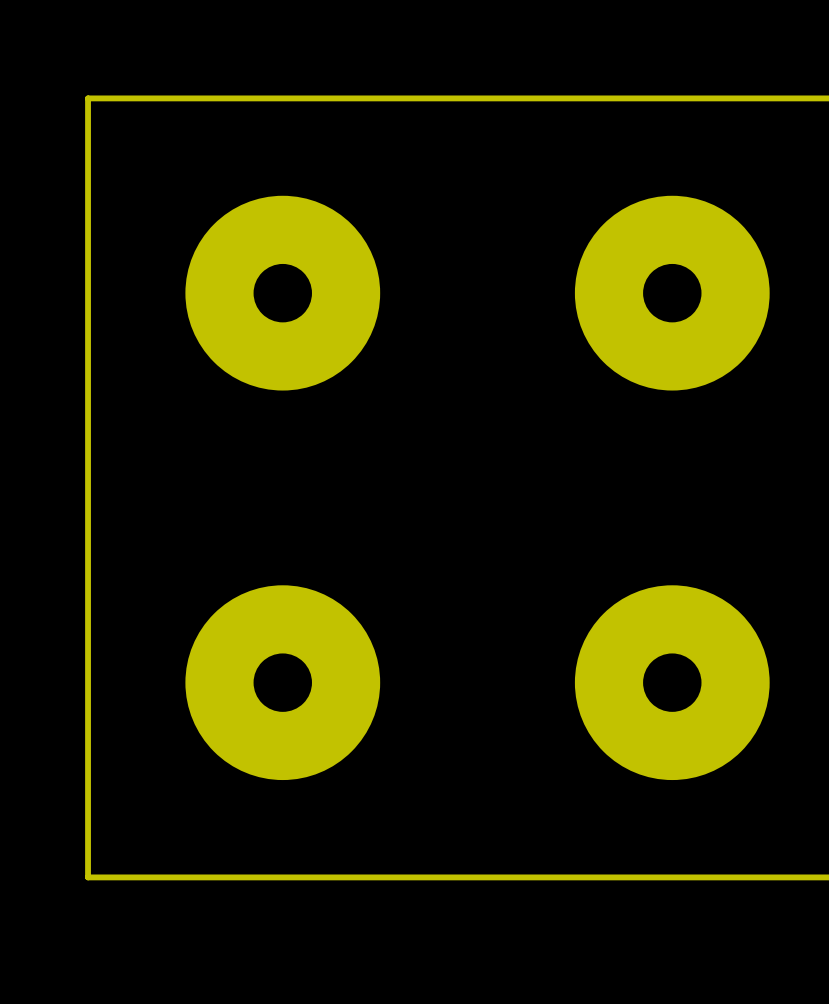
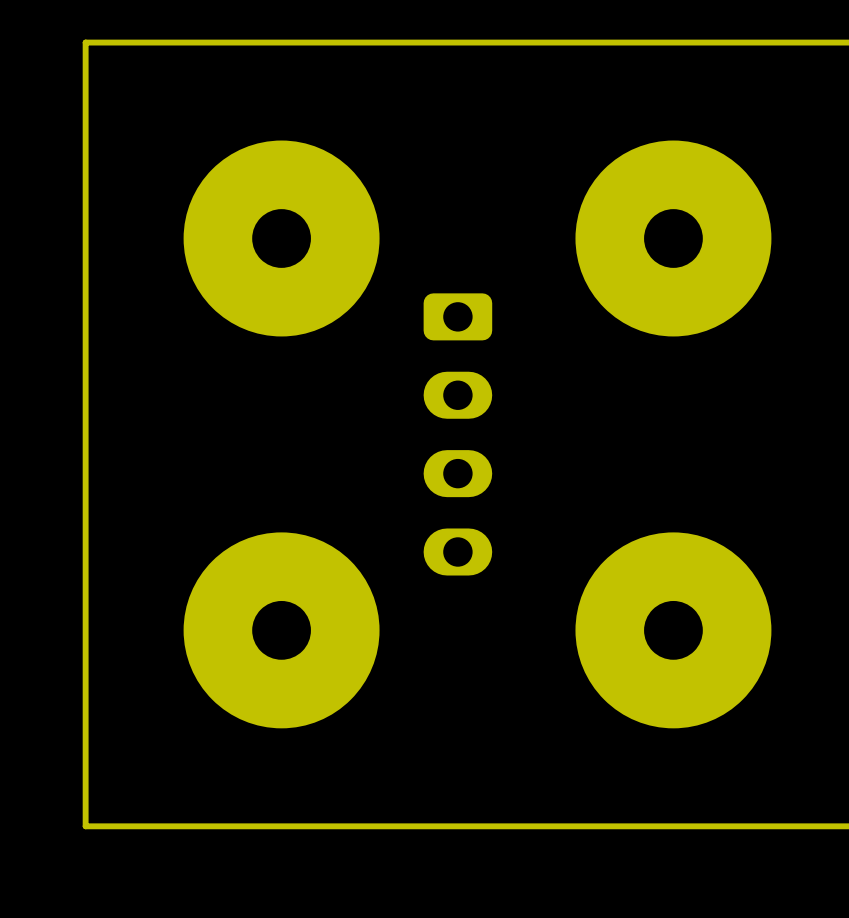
part: none -> (457, 434)

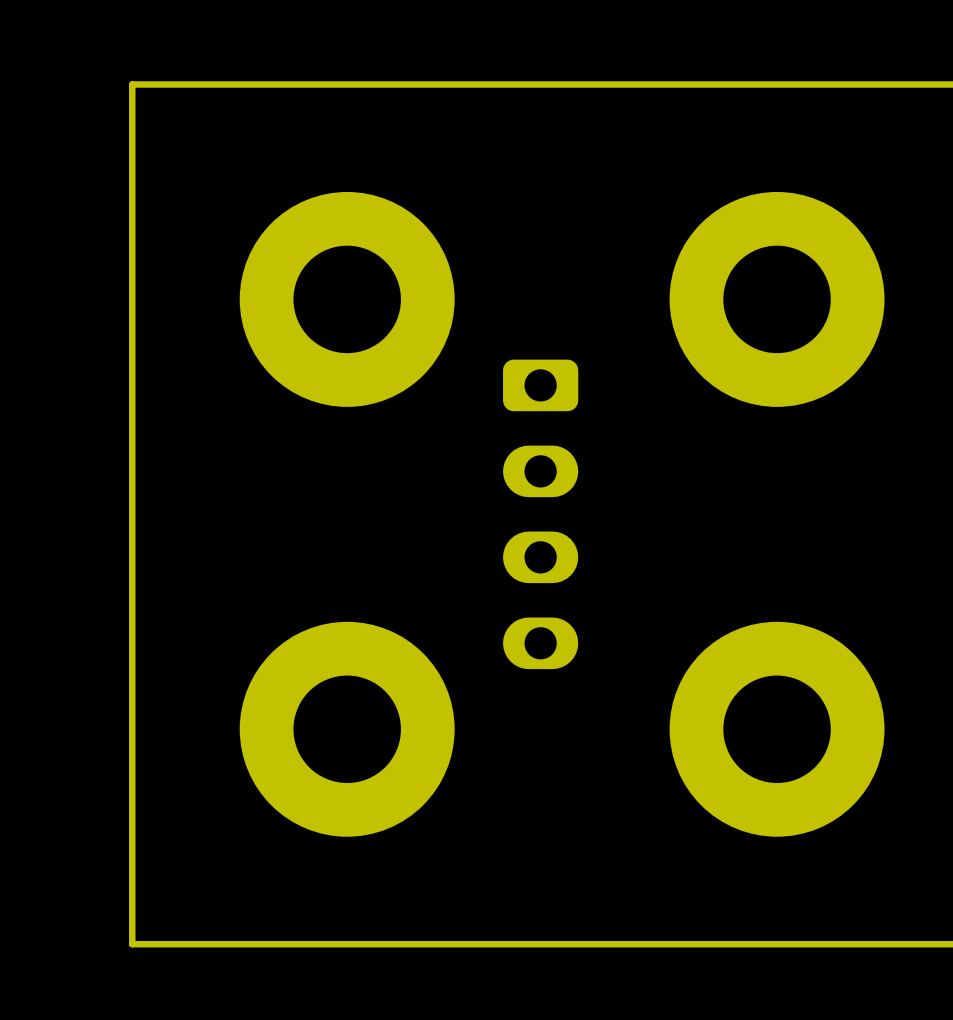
part footprint: [183, 140, 380, 337] -> [239, 191, 455, 407]
part footprint: [575, 140, 772, 337] -> [669, 191, 885, 407]
part footprint: [183, 532, 380, 729] -> [239, 621, 455, 837]
part footprint: [575, 532, 772, 729] -> [669, 621, 885, 837]

